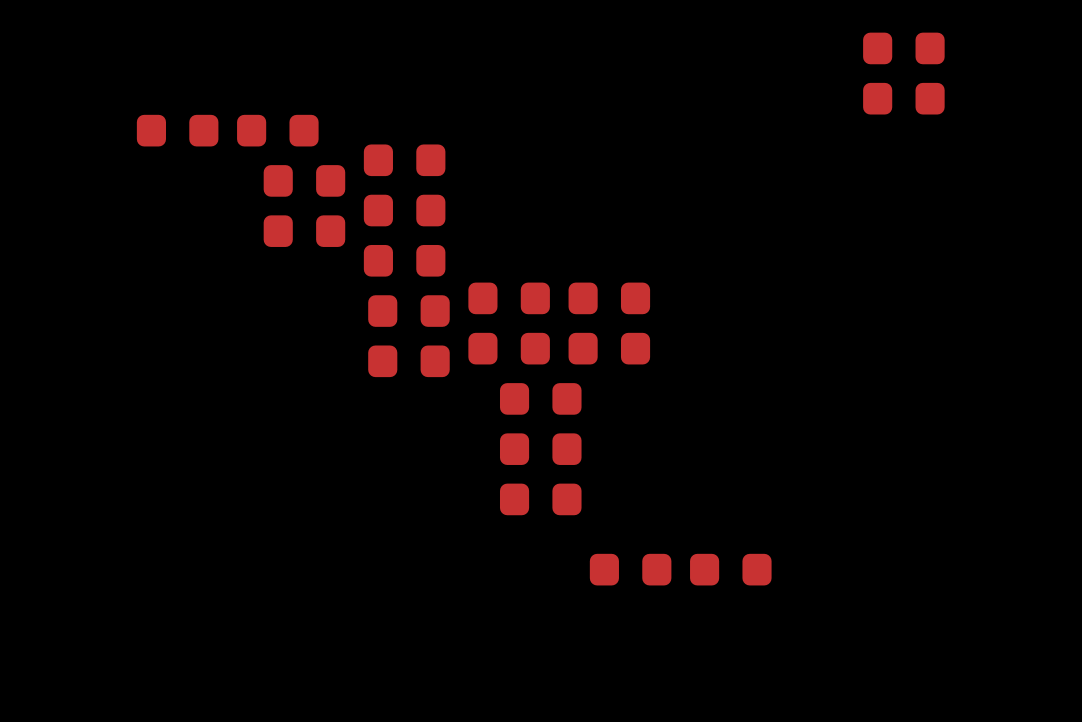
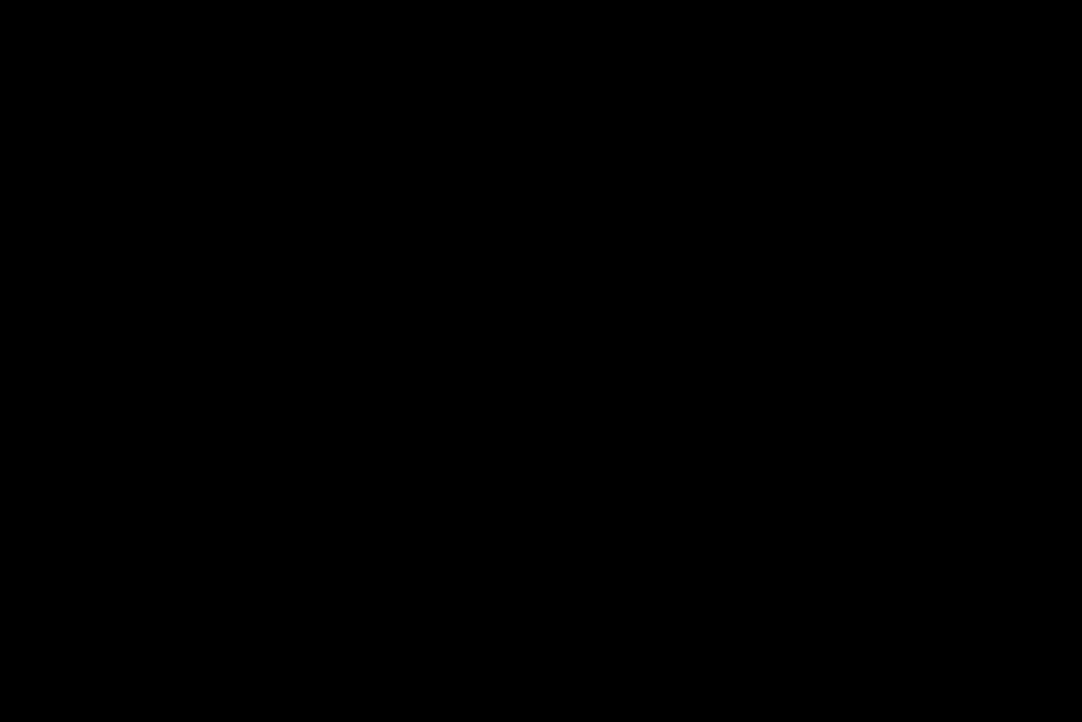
part: (903, 48) -> none
part: (903, 98) -> none
part: (177, 130) -> none
part: (277, 130) -> none
part: (404, 160) -> none
part: (304, 180) -> none
part: (404, 210) -> none
part: (304, 231) -> none
part: (404, 260) -> none
part: (509, 298) -> none
part: (609, 298) -> none
part: (408, 311) -> none
part: (509, 348) -> none
part: (609, 348) -> none
part: (408, 361) -> none
part: (540, 398) -> none
part: (540, 449) -> none
part: (540, 499) -> none
part: (630, 569) -> none
part: (730, 569) -> none

